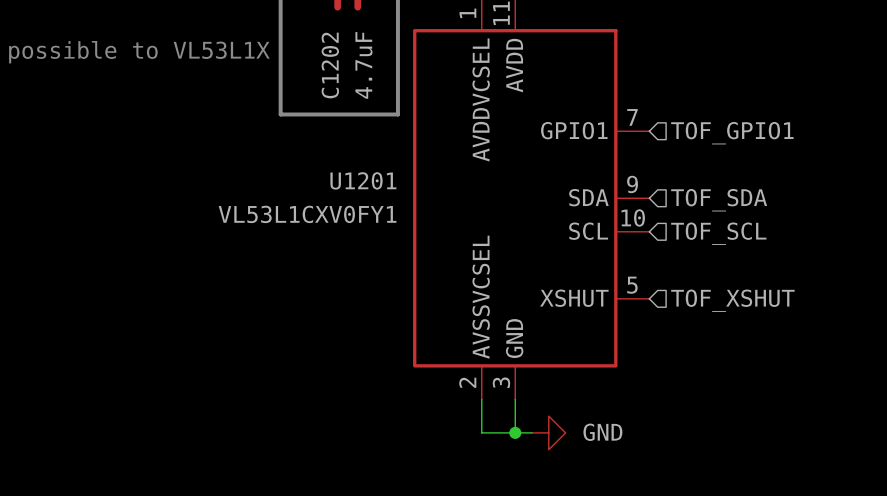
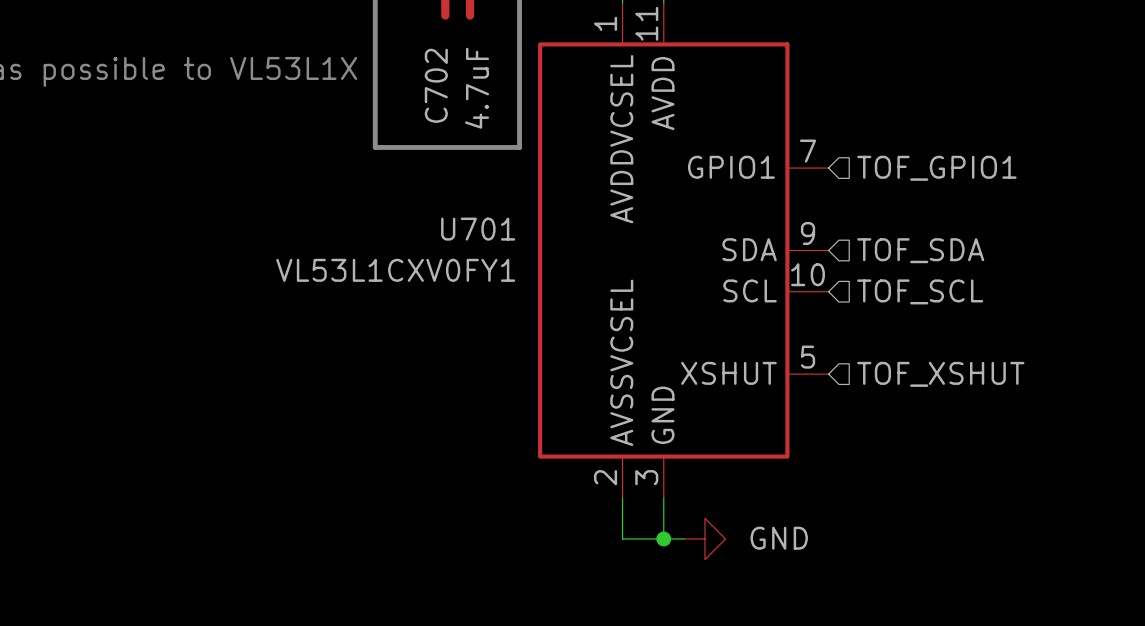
C1202 name: C1202 (330, 65) -> C702 (436, 85)
U1201 name: U1201 (363, 180) -> U701 (478, 229)

